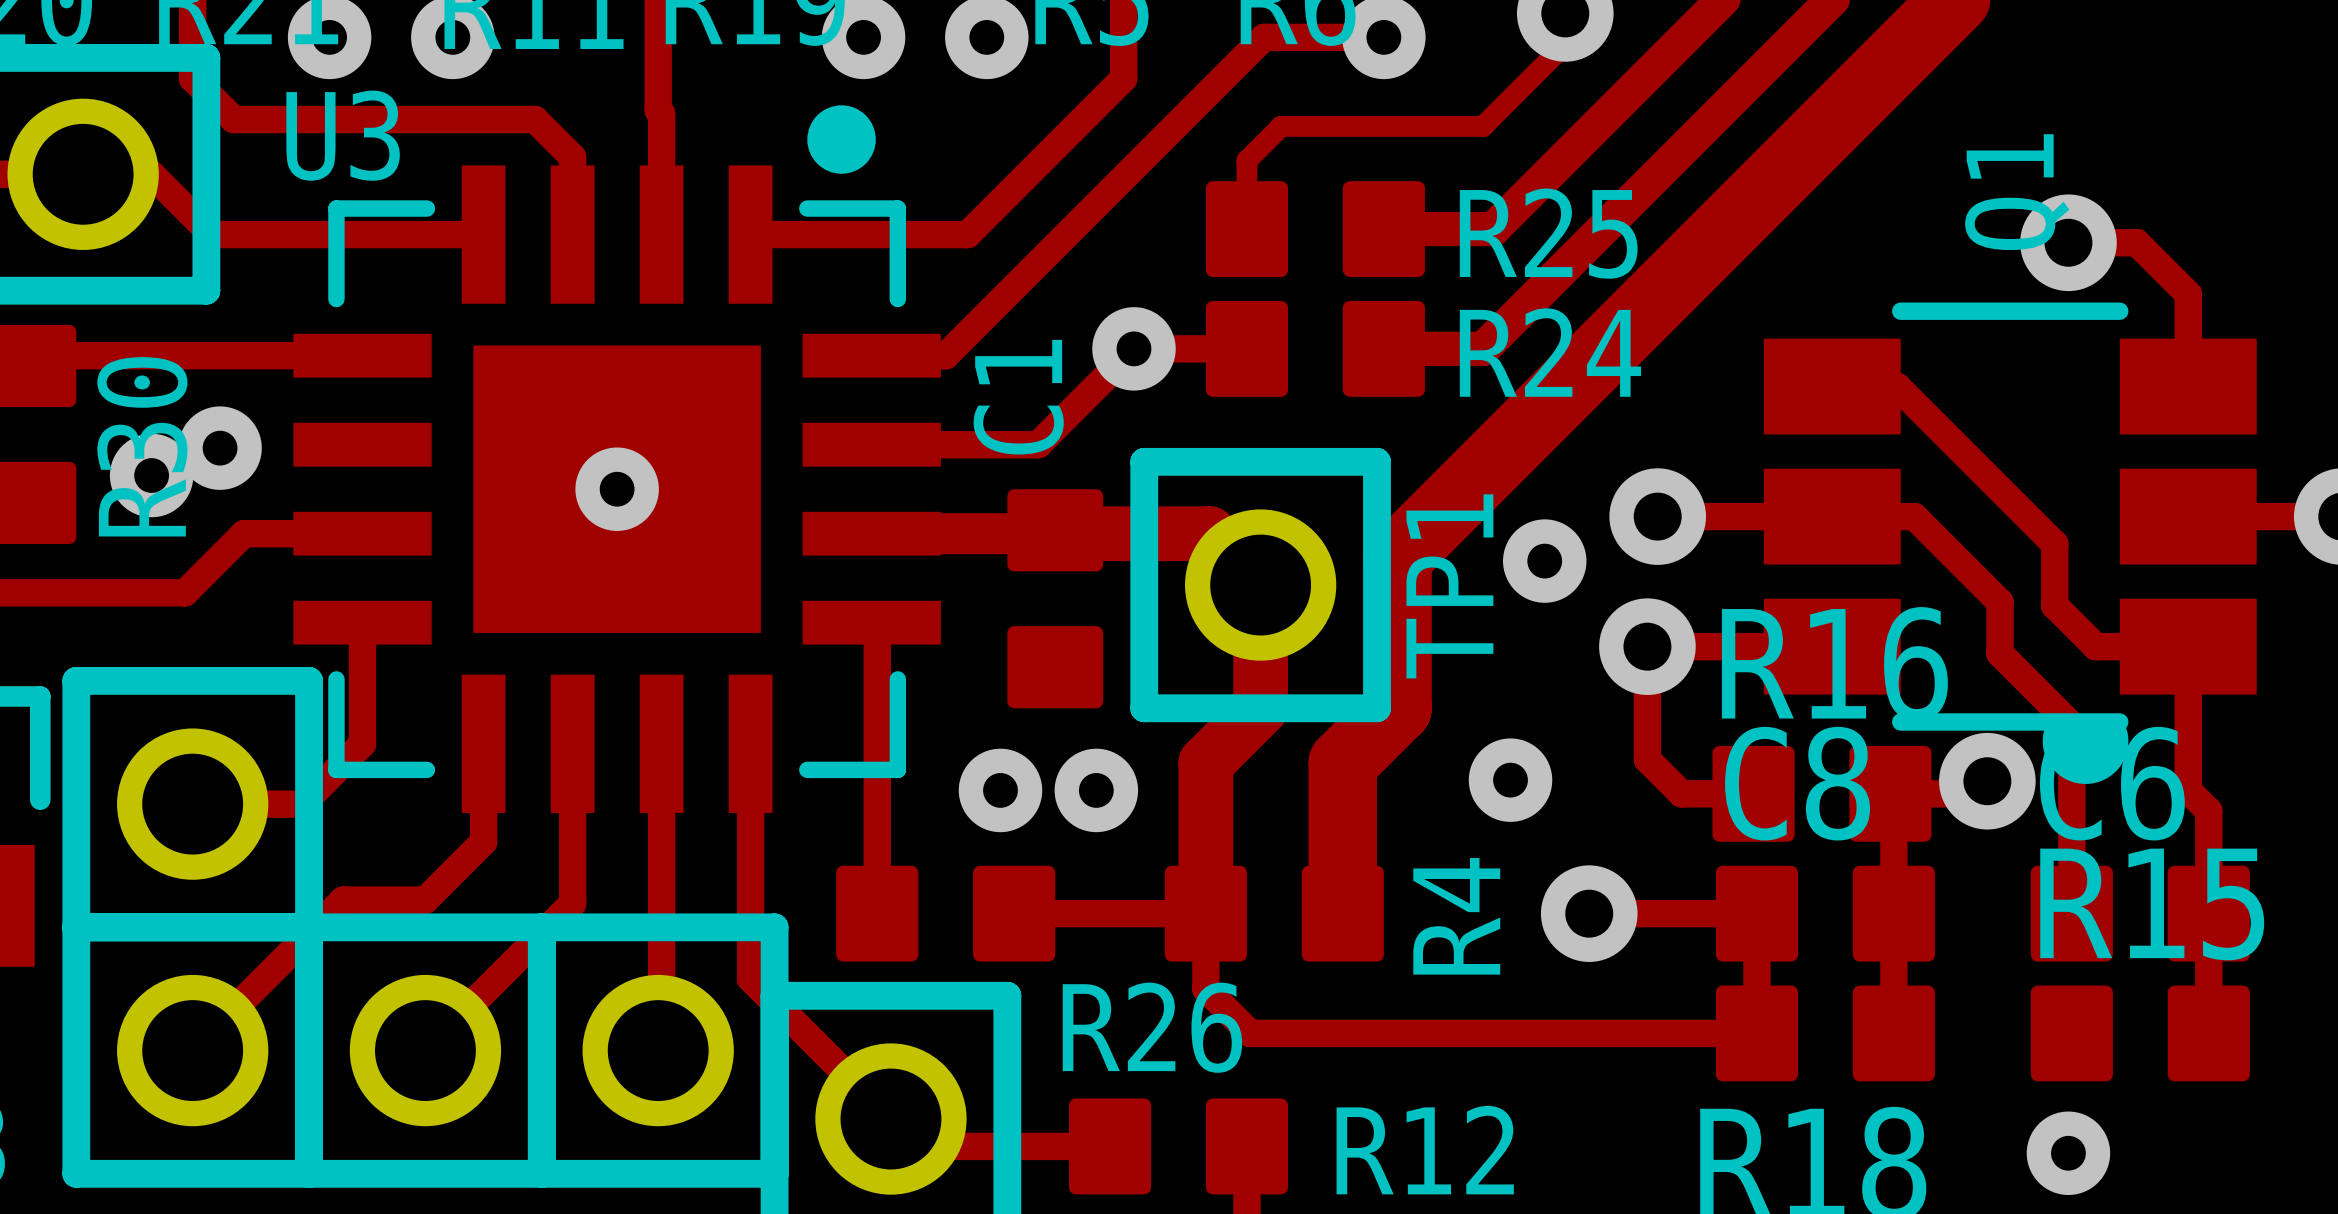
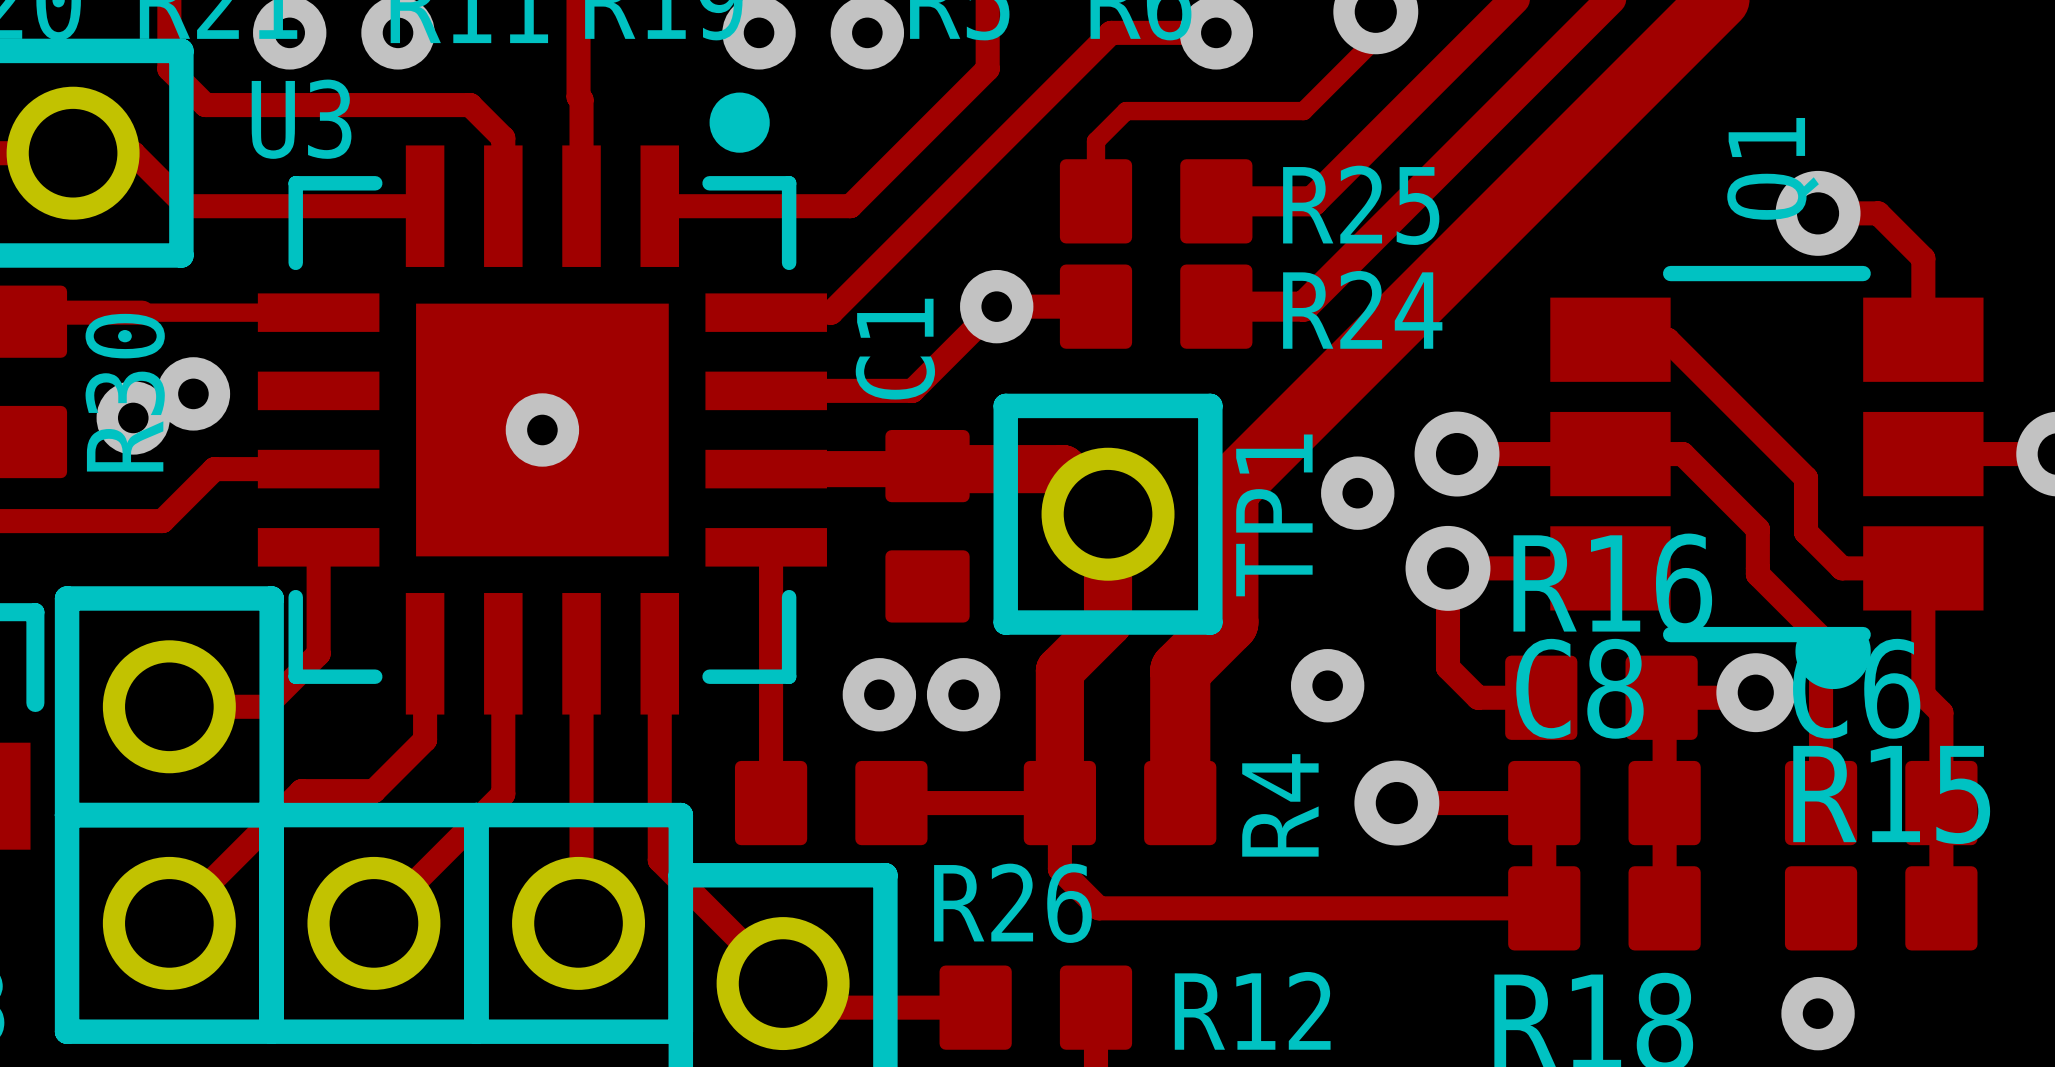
track width: thick (161, 355) (362, 355) -> thin (142, 312) (318, 312)
via size: [1939, 732, 2036, 830] -> [1716, 653, 1796, 733]

